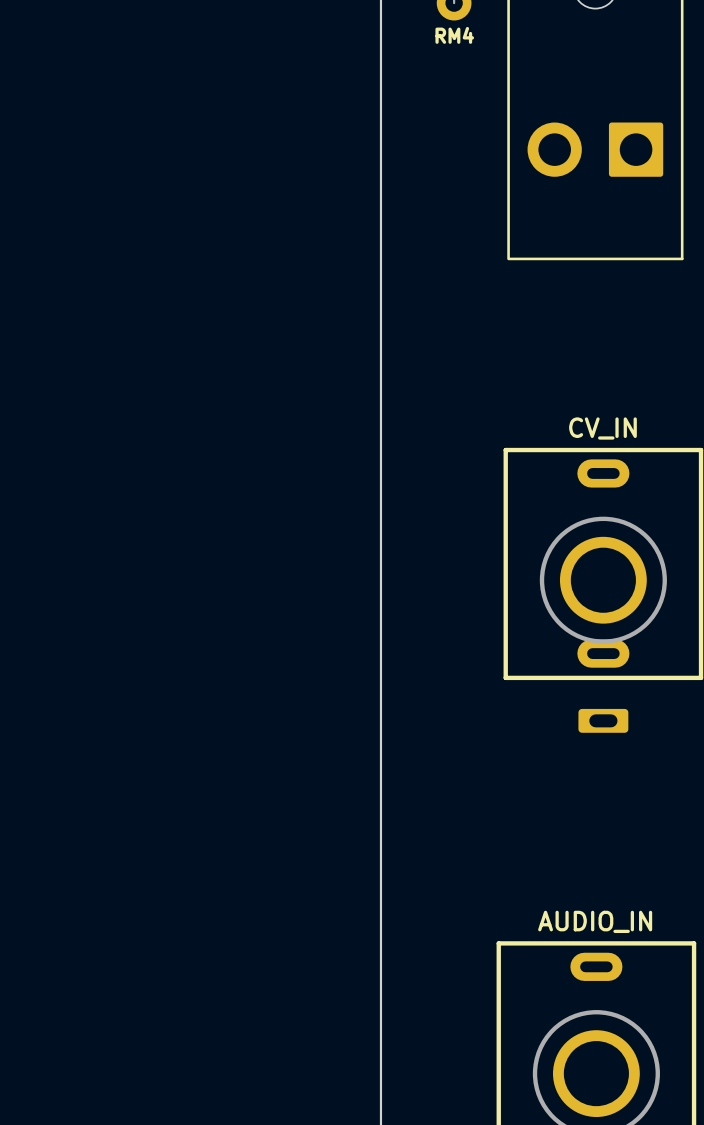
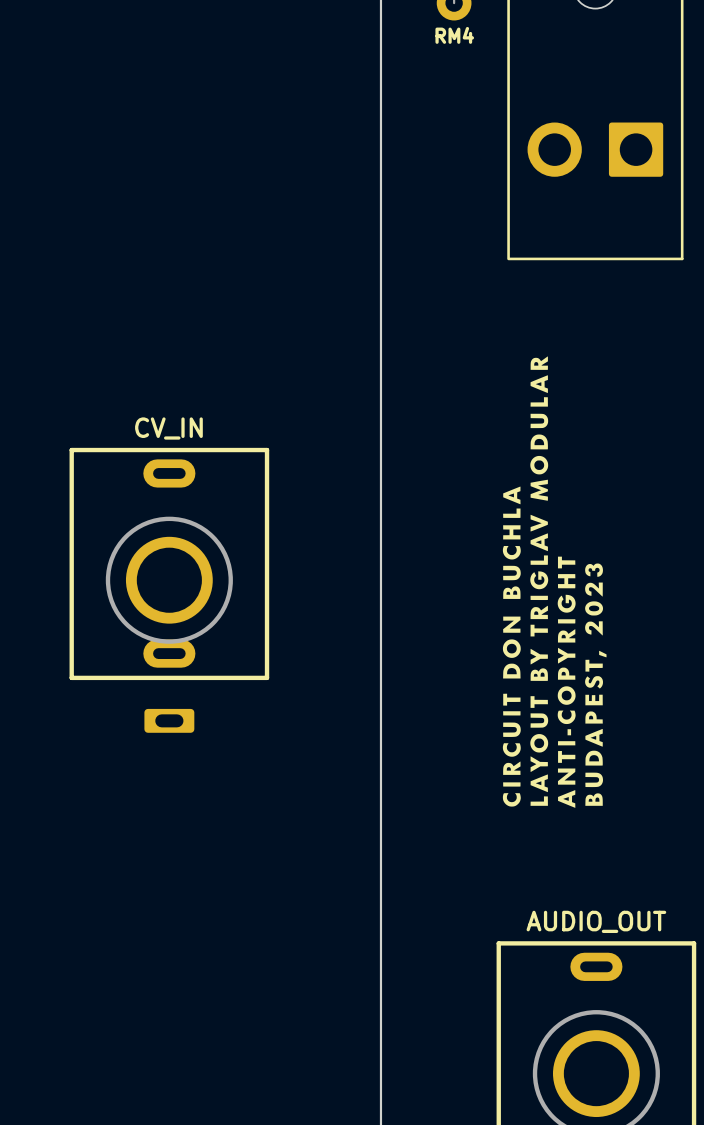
drawing: none -> [502, 356, 607, 808]
part position: (603, 590) -> (169, 590)
part value: AUDIO_IN (595, 921) -> AUDIO_OUT (596, 921)

